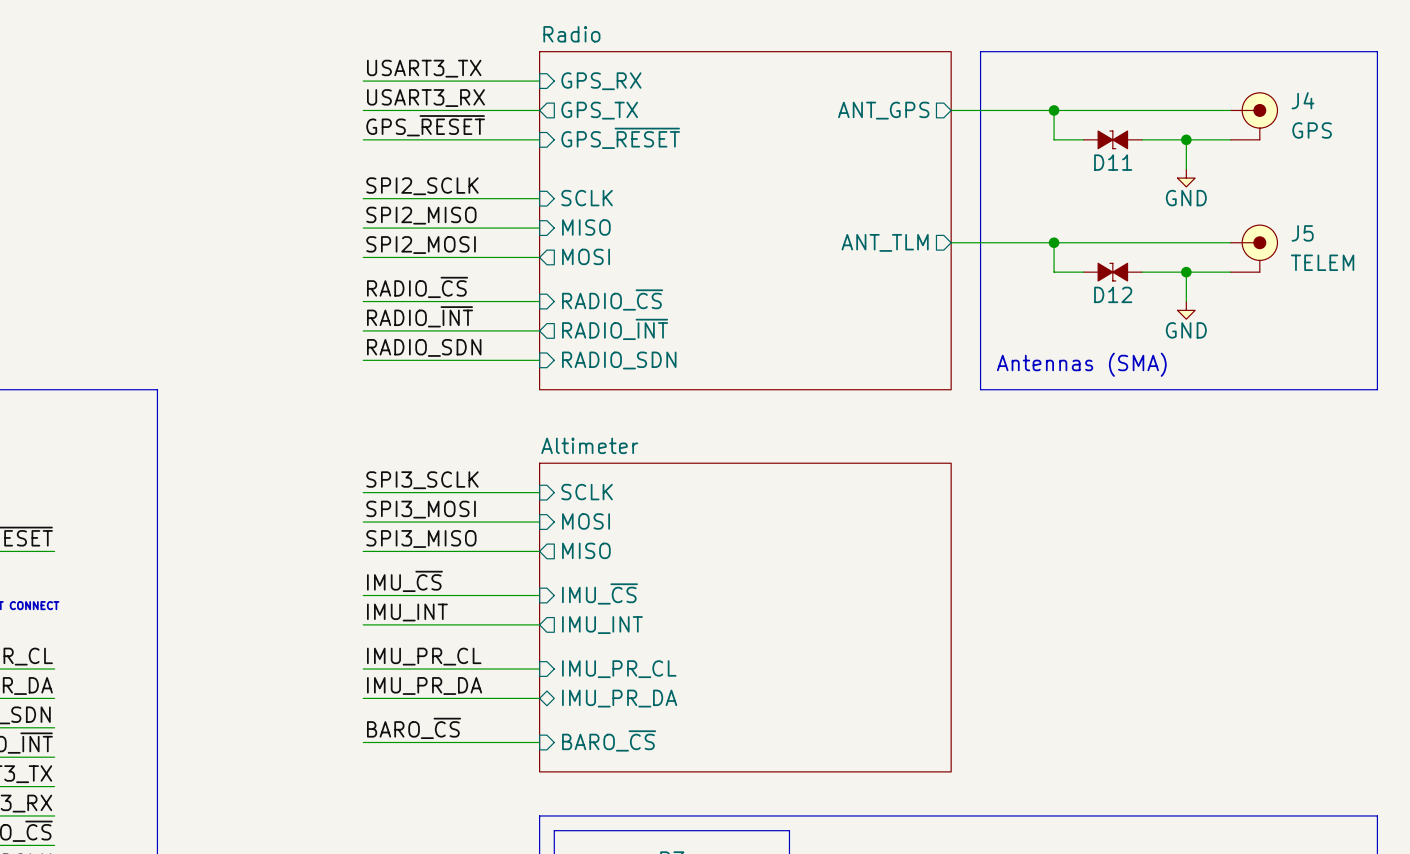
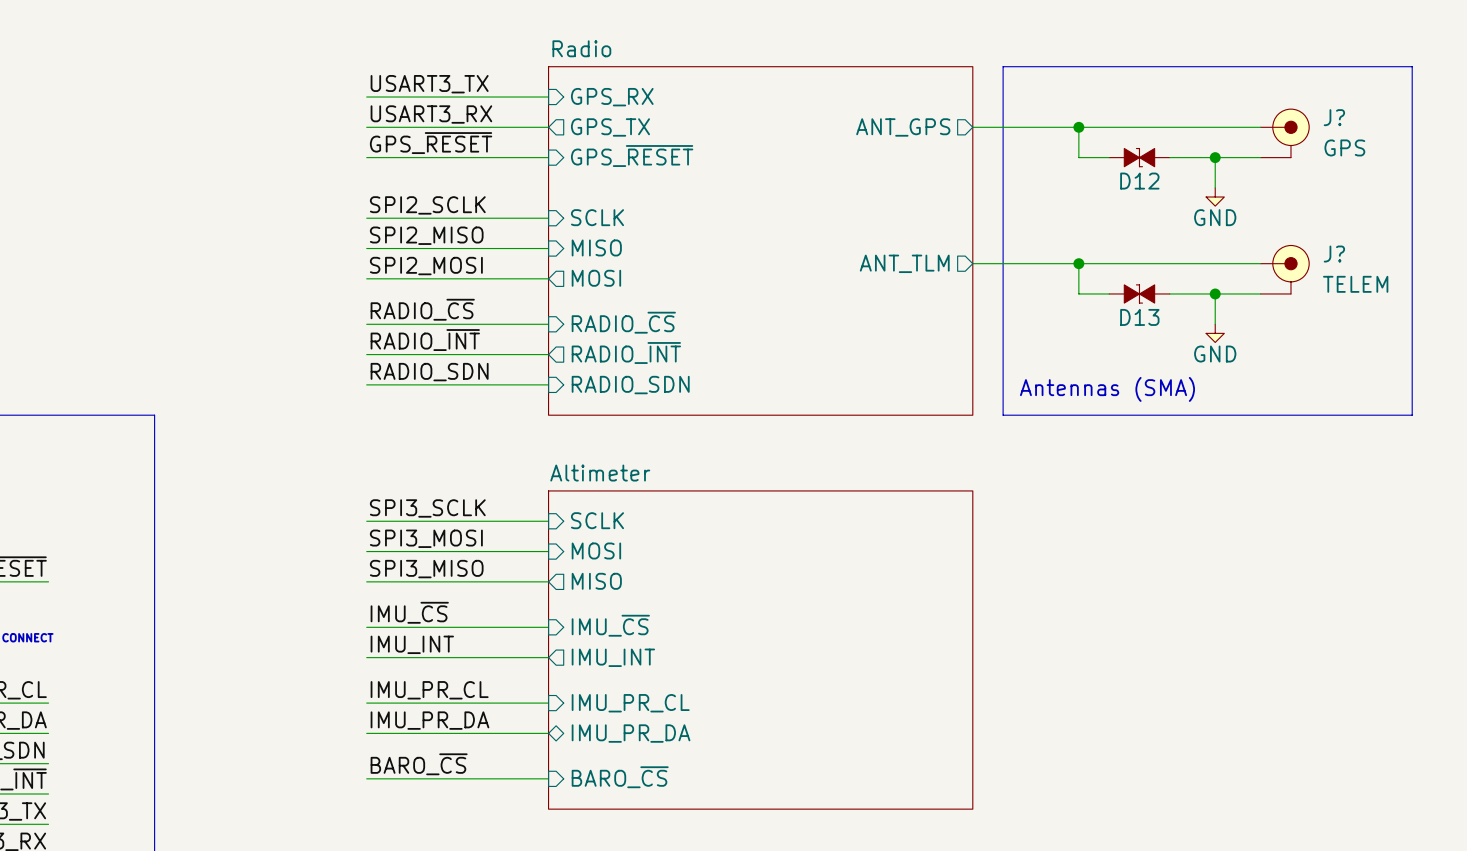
J4 name: J4 (1302, 100) -> J? (1334, 117)
D11 name: D11 (1113, 162) -> D12 (1139, 181)
J5 name: J5 (1302, 233) -> J? (1334, 254)
D12 name: D12 (1113, 294) -> D13 (1139, 317)

